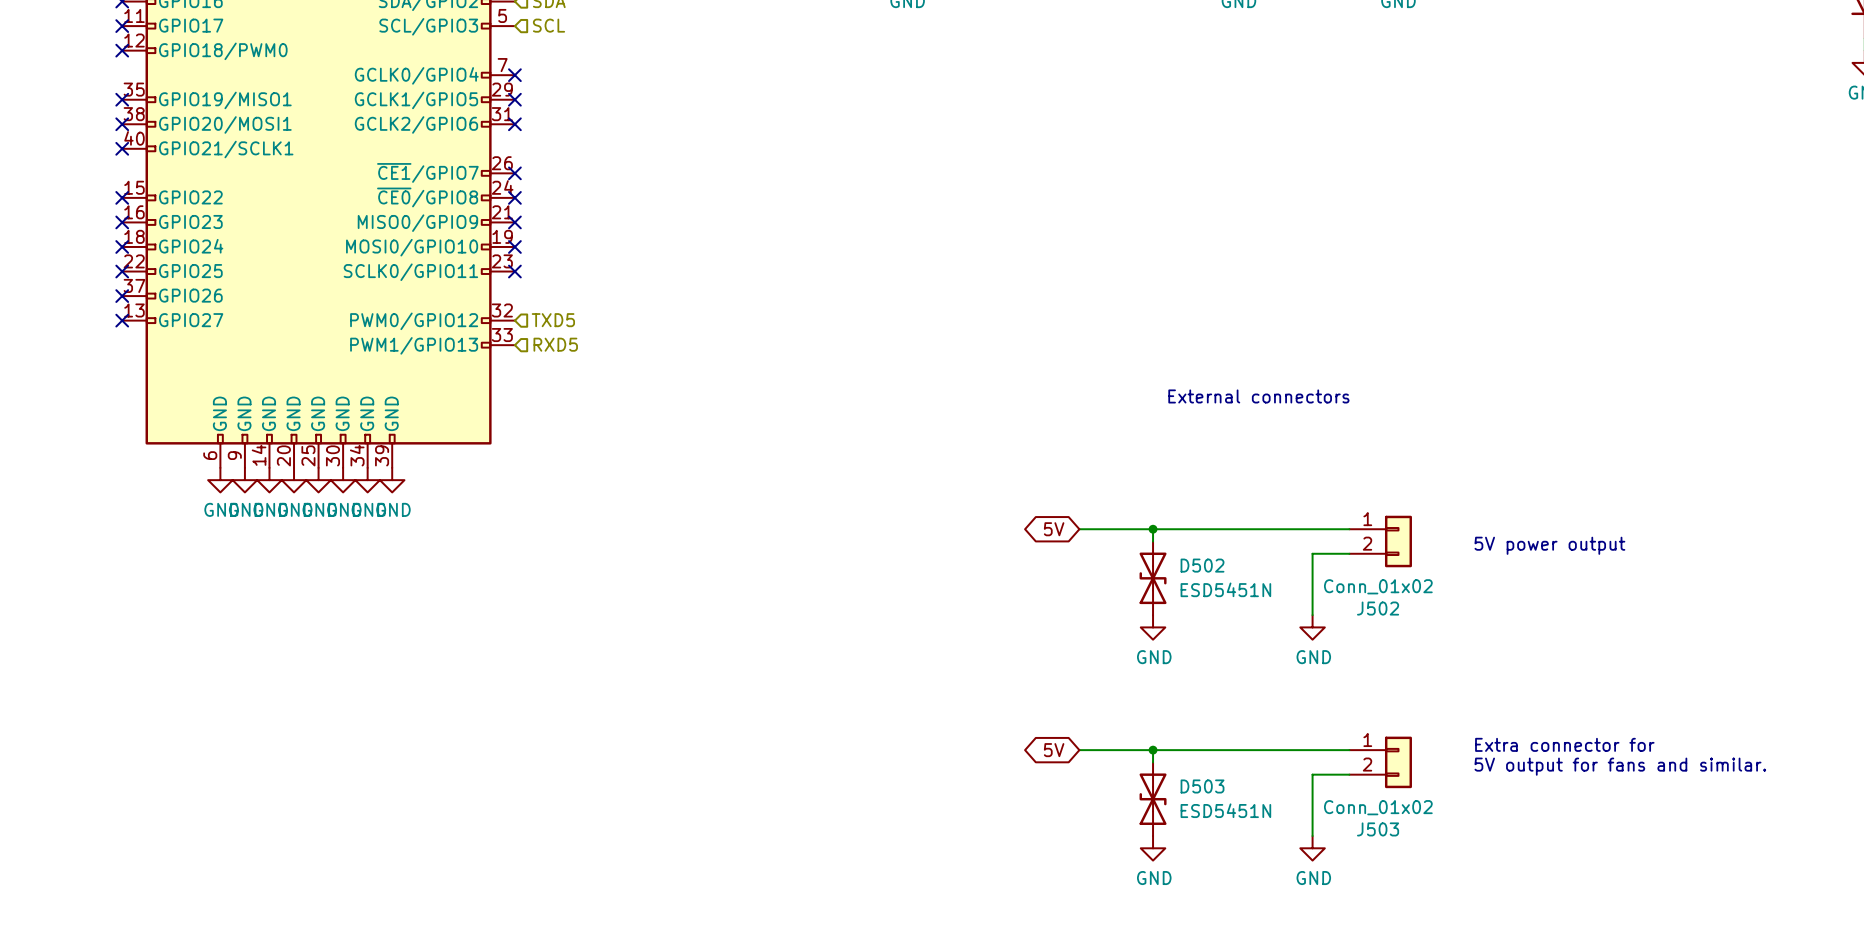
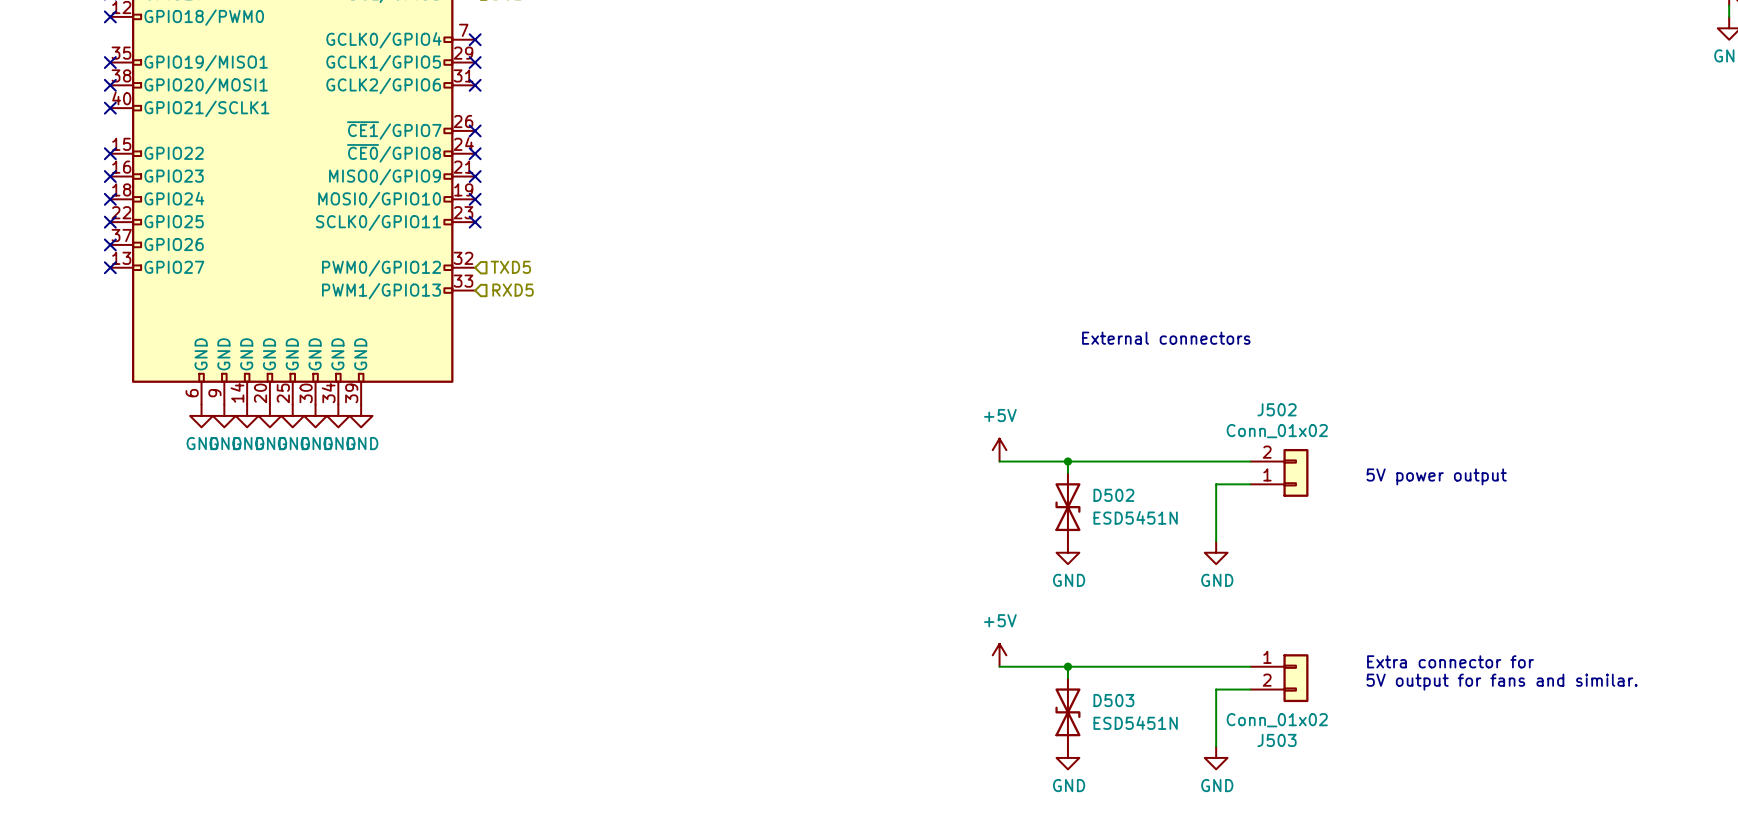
power symbol: none -> +5V (999, 450)
global label: 5V (1054, 529) -> none
J502 flip: as is (1398, 541) -> up-down (1295, 472)
power symbol: none -> +5V (999, 655)
global label: 5V (1054, 750) -> none

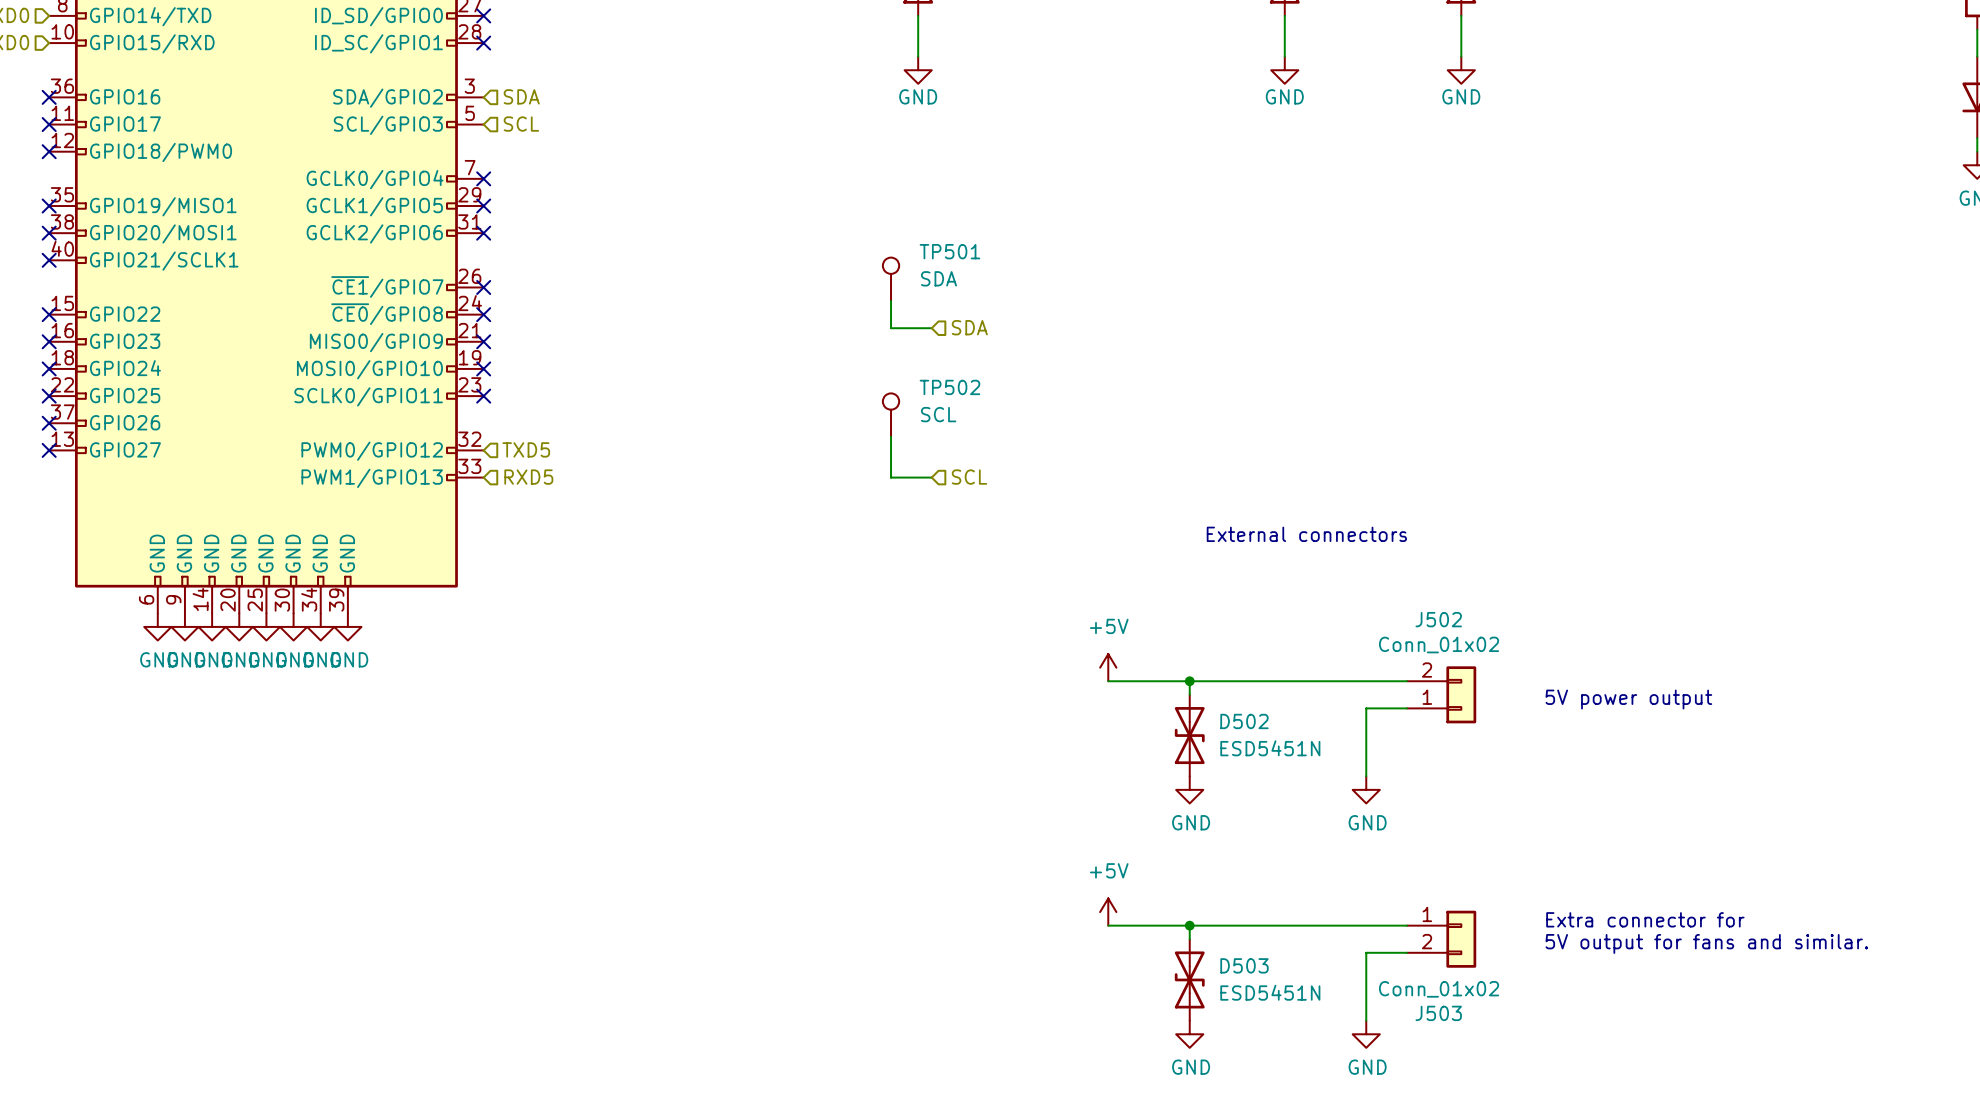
TP501: none -> SDA (891, 279)
wire: none -> (891, 301) (891, 328) (931, 328)
hierarchical label: none -> SDA (969, 327)
TP502: none -> SCL (891, 415)
wire: none -> (891, 436) (891, 477) (931, 477)
hierarchical label: none -> SCL (969, 477)

